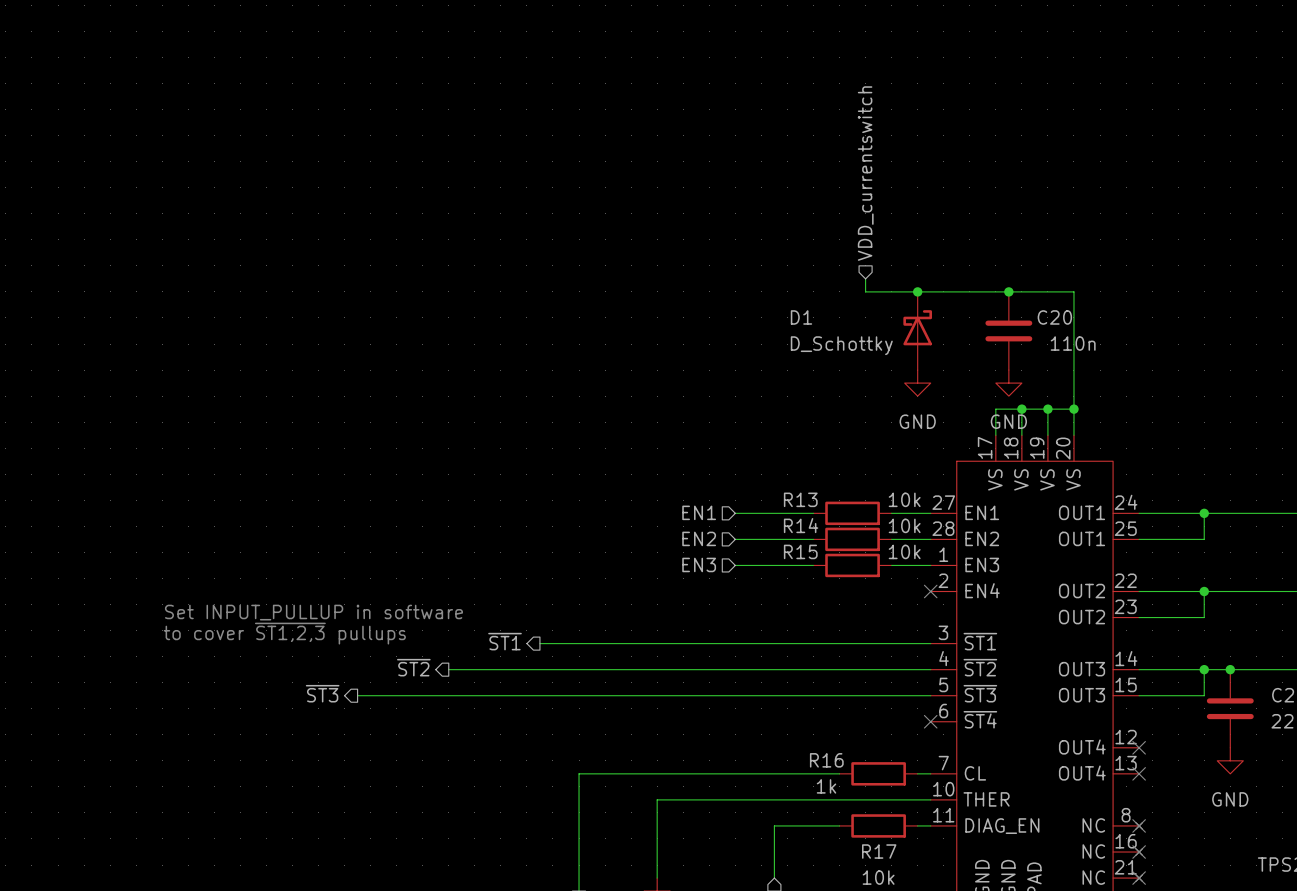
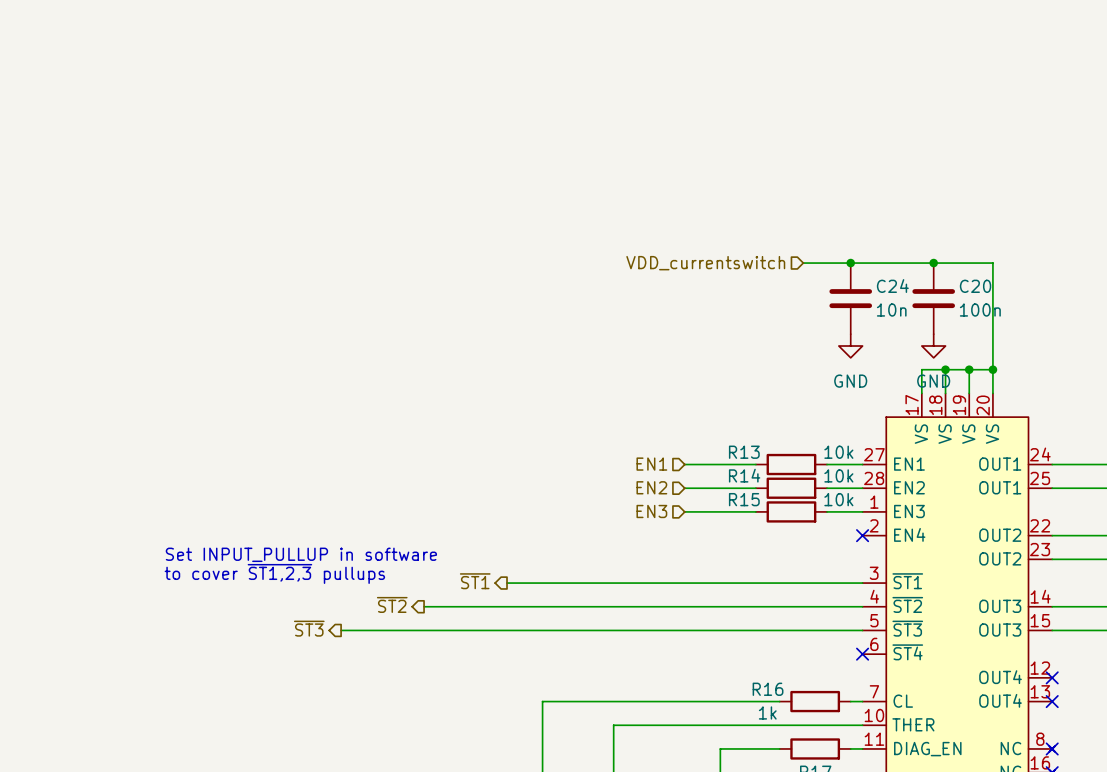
hierarchical label rotation: 0° (865, 173) -> 90° counterclockwise (705, 263)
wire: (865, 278) (865, 291) -> none
D1: D_Schottky (917, 330) -> none
C24: none -> 10n (850, 298)
C20 value: 110n (1073, 343) -> 100n (980, 310)

